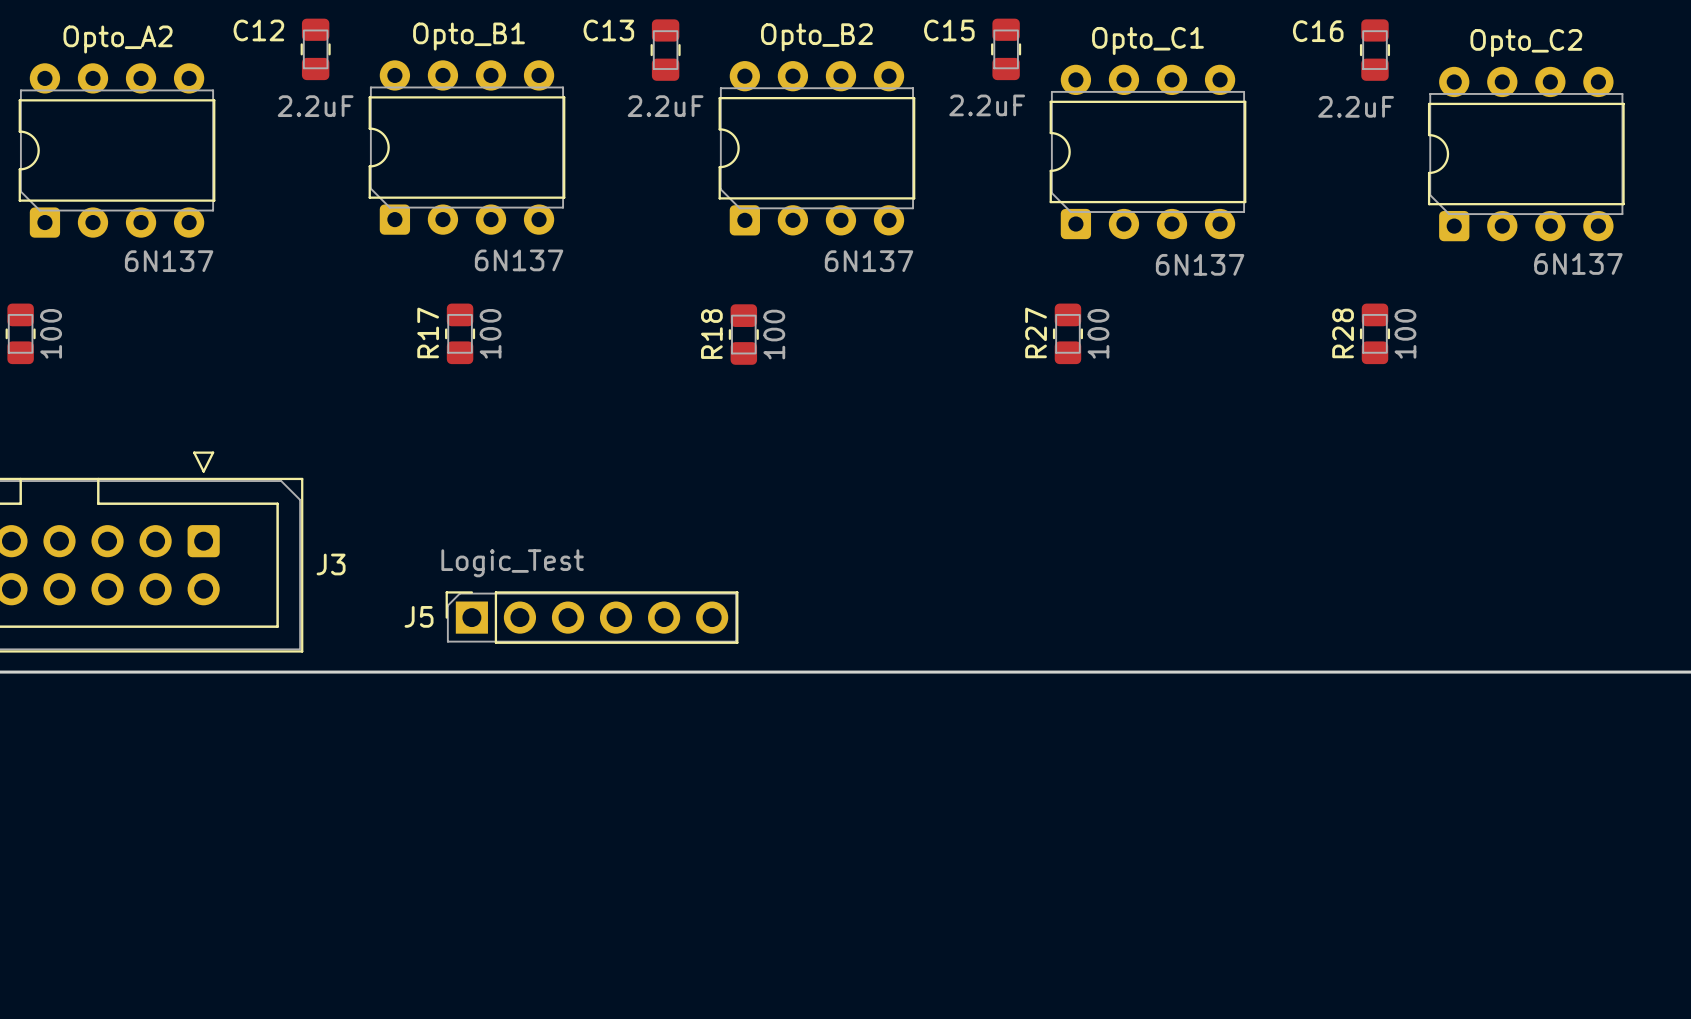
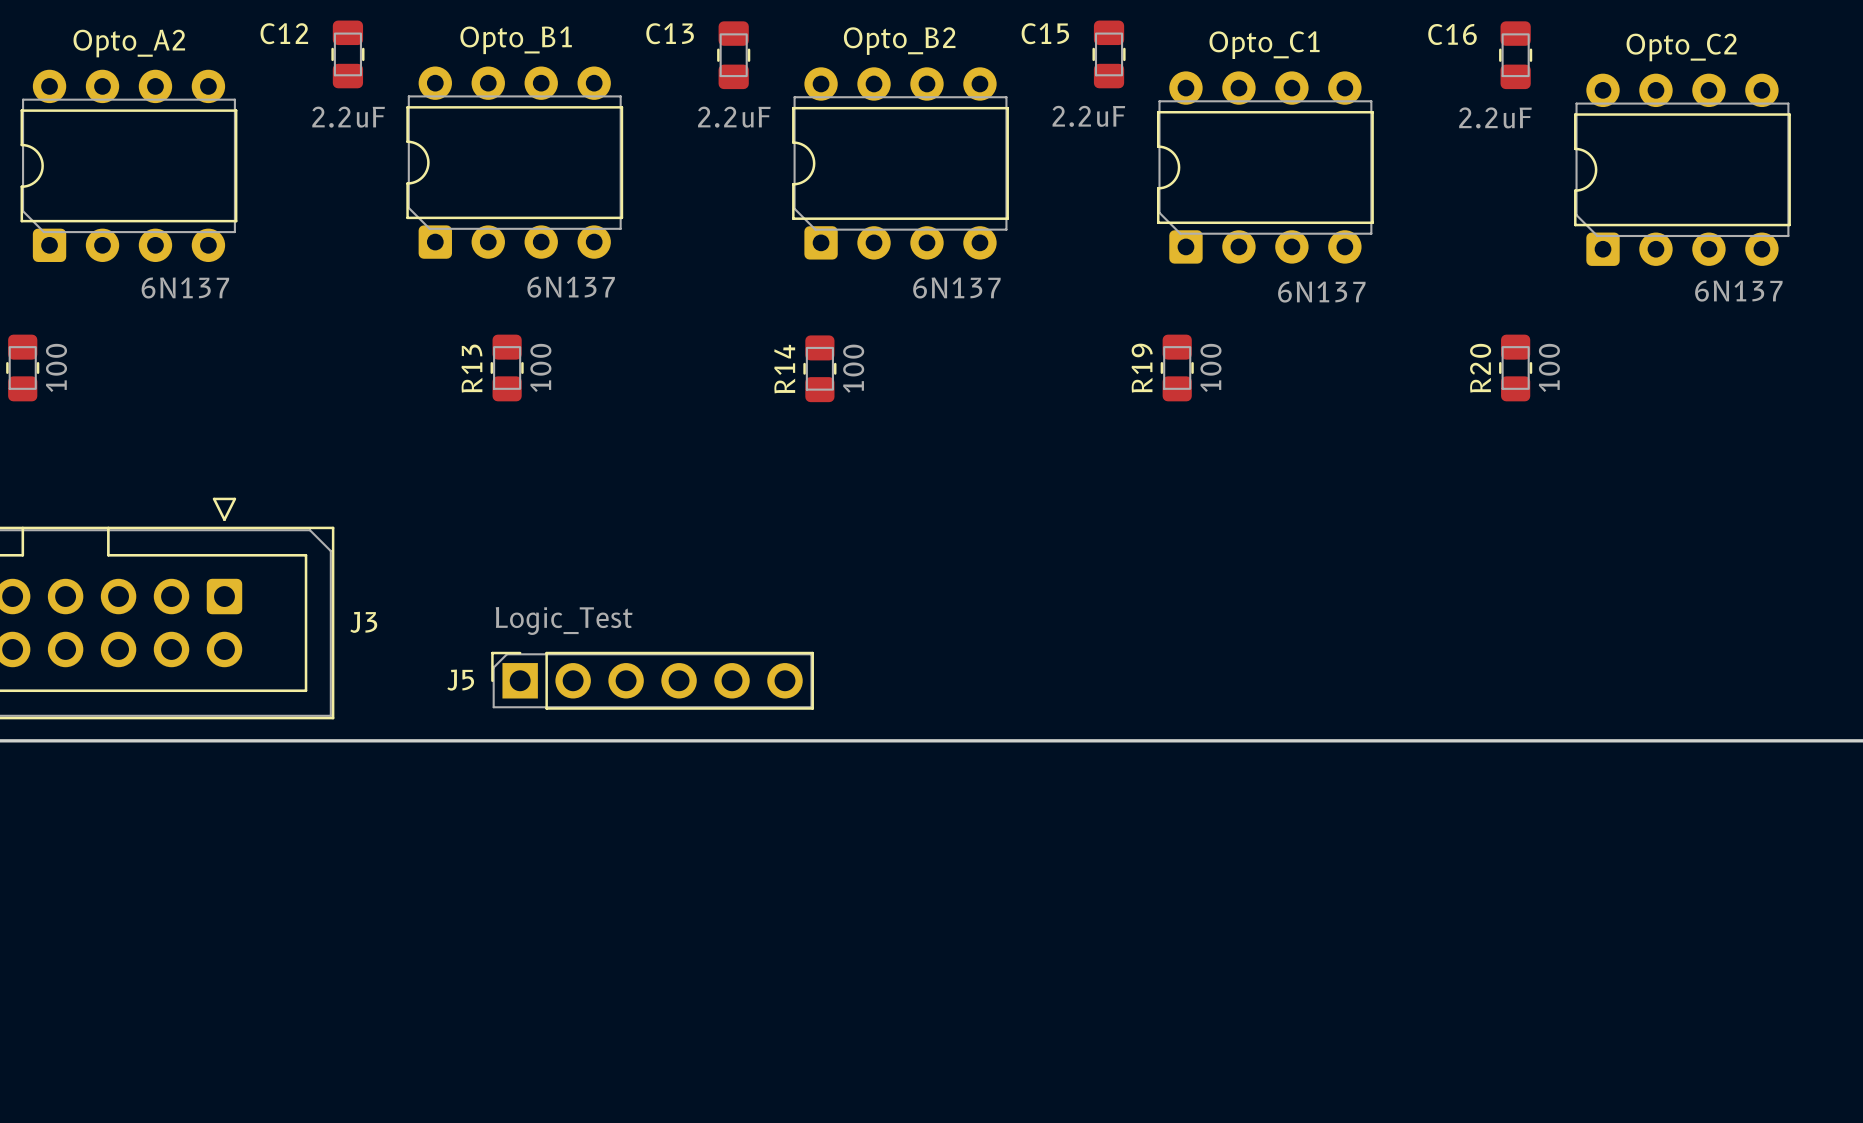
R17 name: R17 (428, 332) -> R13 (471, 368)
R27 name: R27 (1036, 332) -> R19 (1142, 368)
R28 name: R28 (1343, 333) -> R20 (1480, 368)
R18 name: R18 (711, 334) -> R14 (784, 369)

